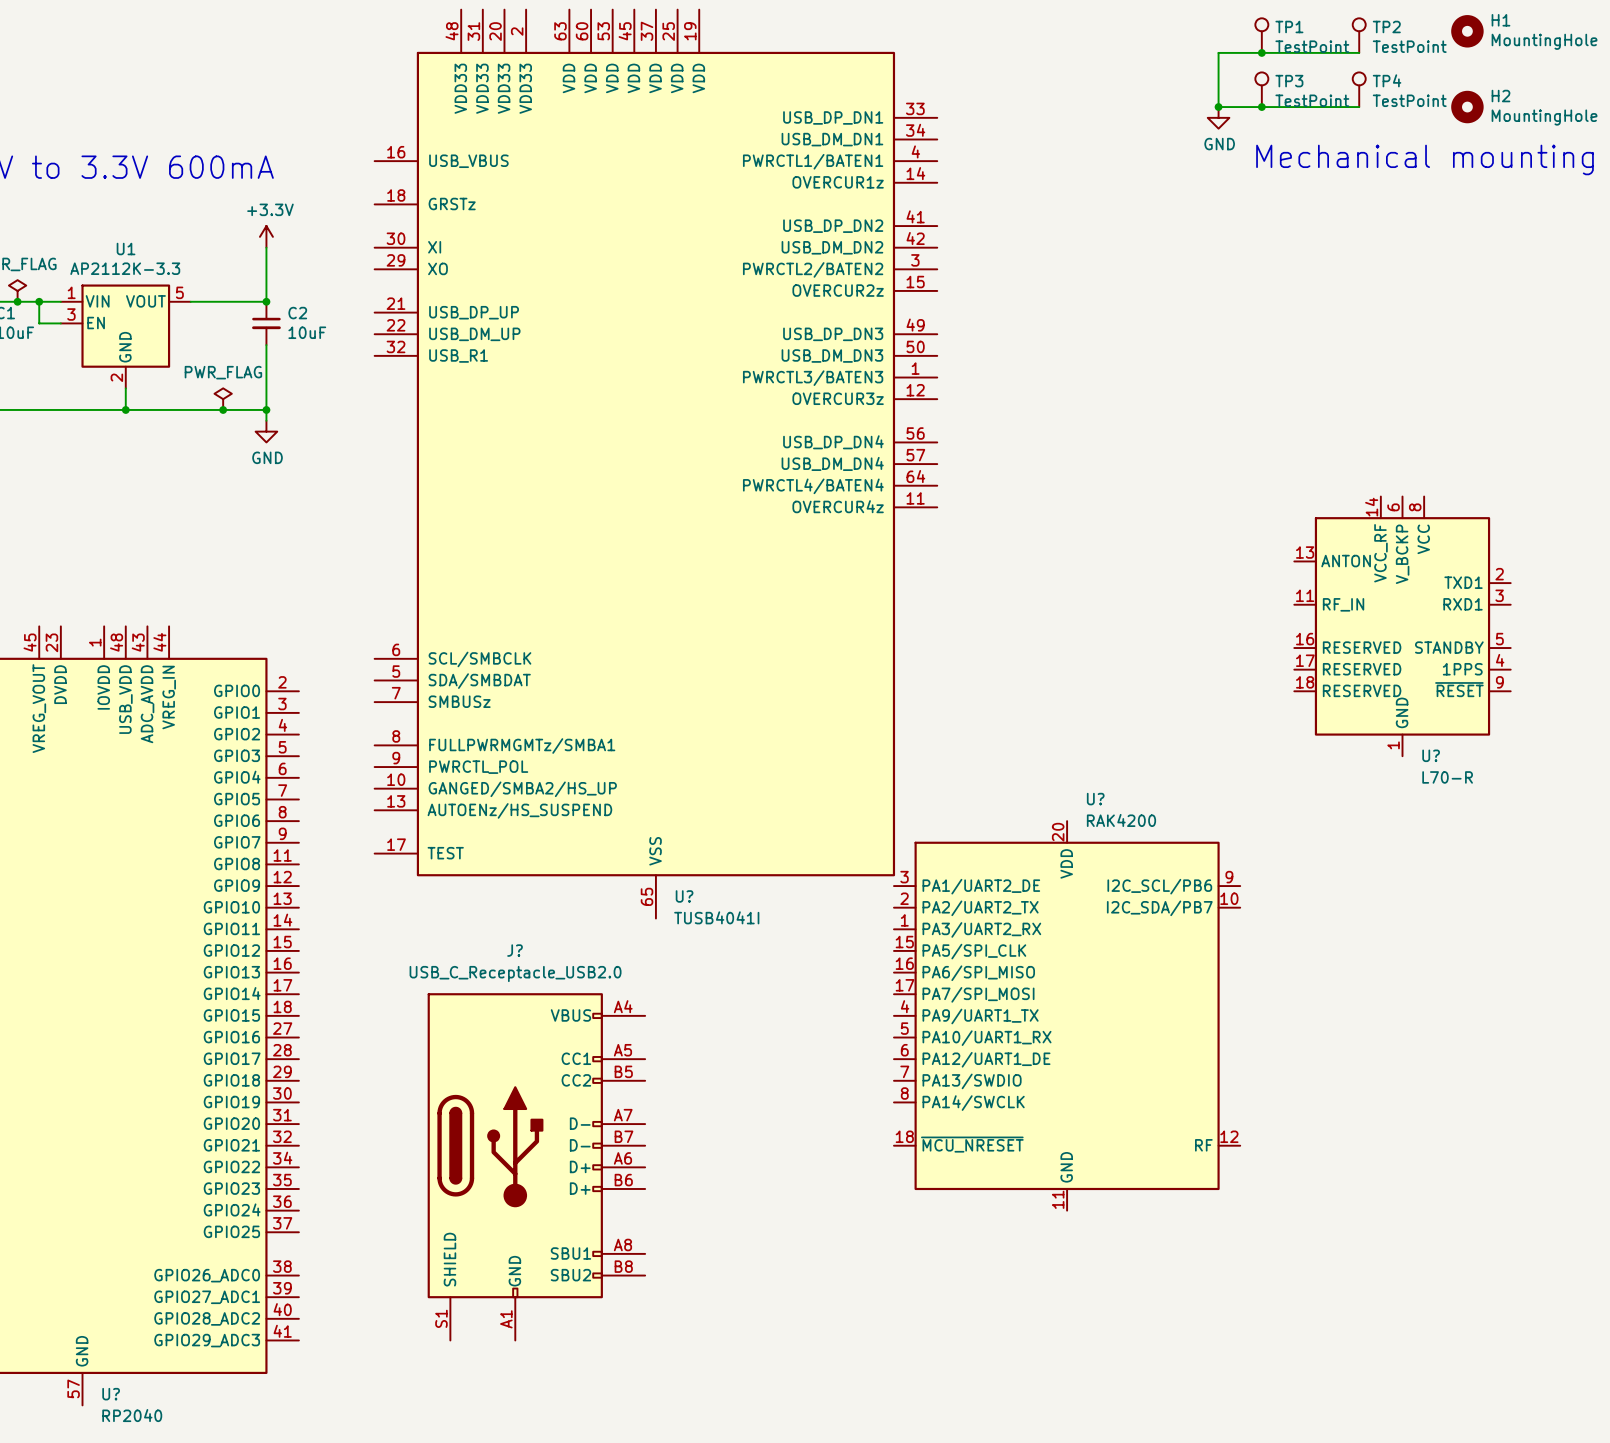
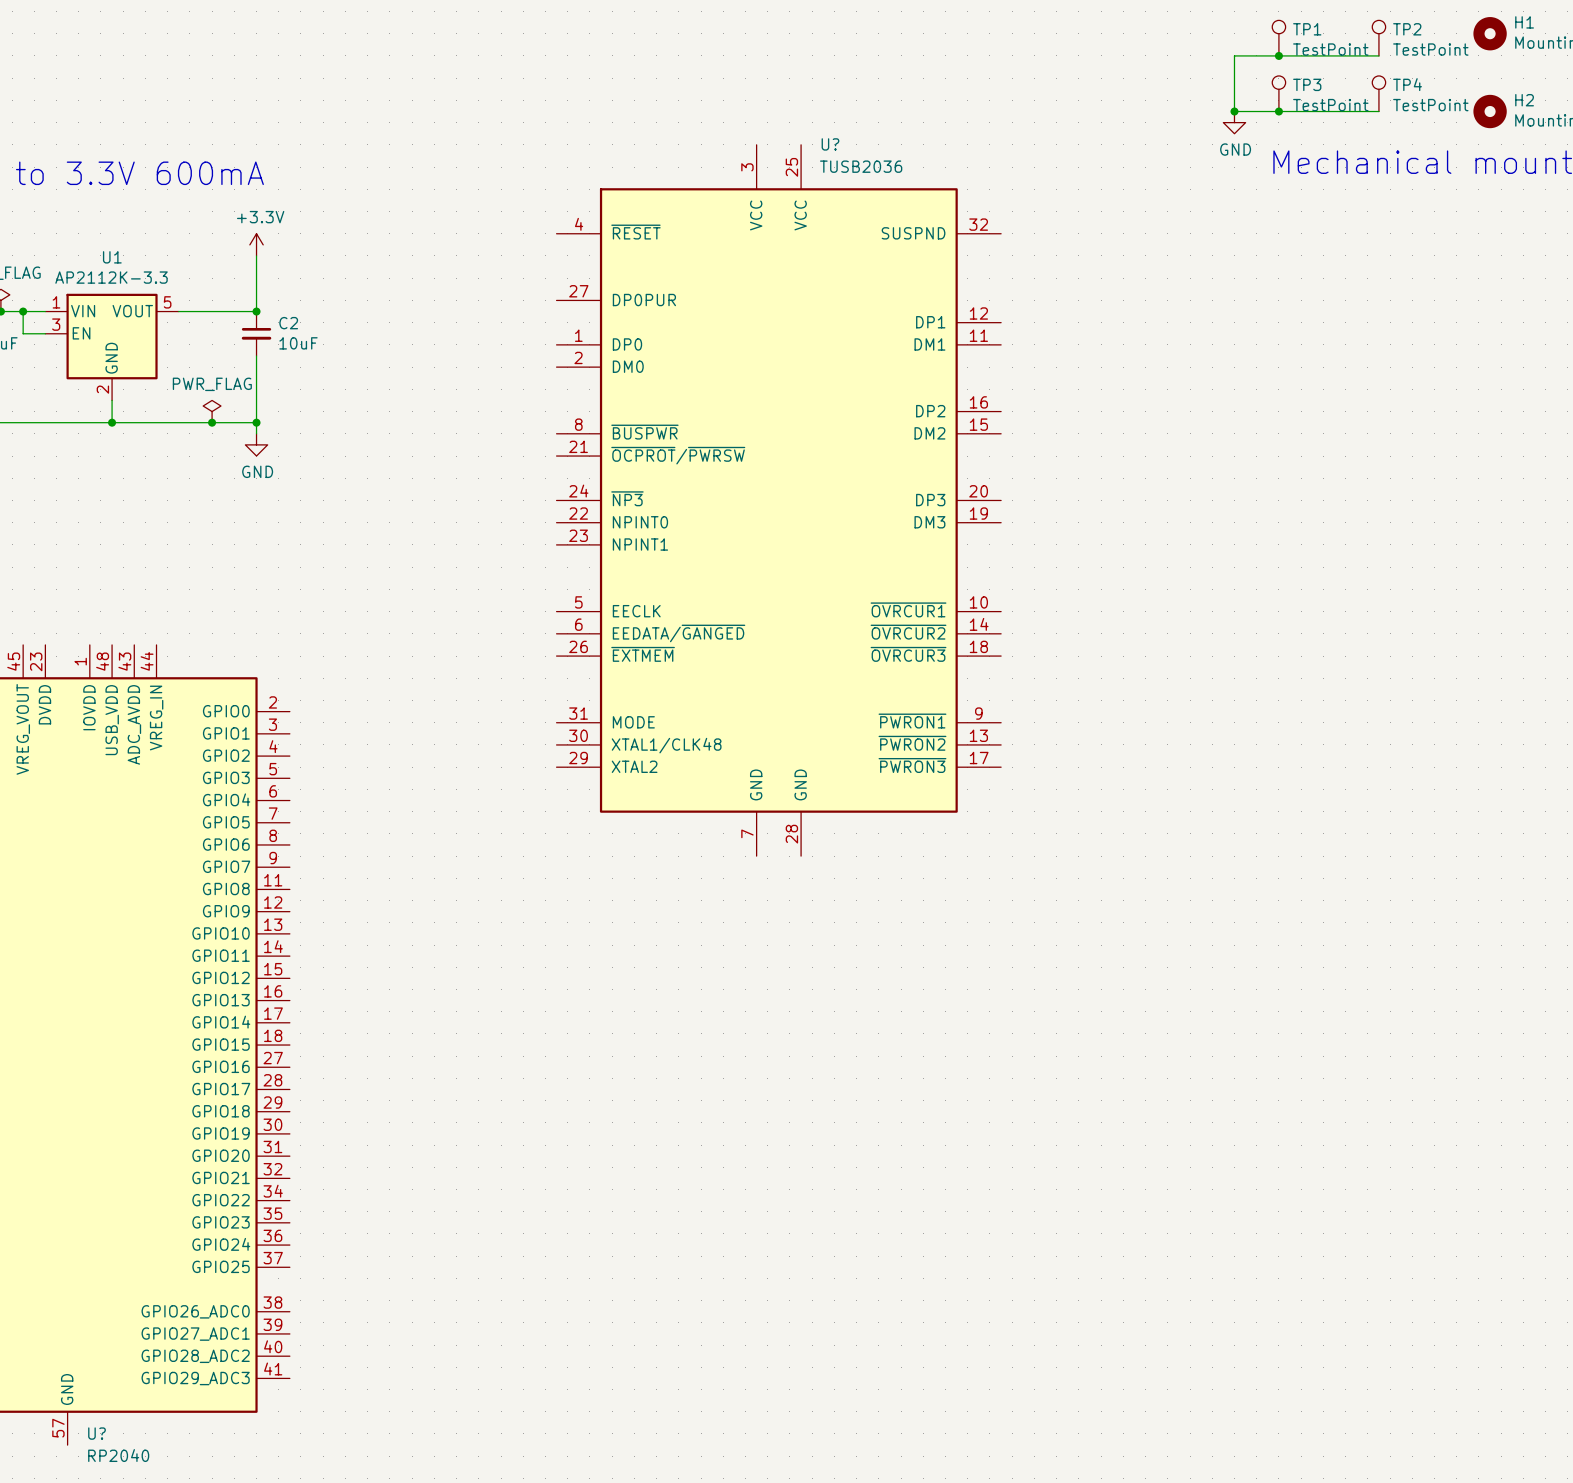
U?: TUSB4041I (655, 464) -> none
U?: none -> TUSB2036 (778, 500)
U?: L70-R (1402, 626) -> none
U?: RAK4200 (1067, 1015) -> none
J?: USB_C_Receptacle_USB2.0 (536, 1166) -> none

